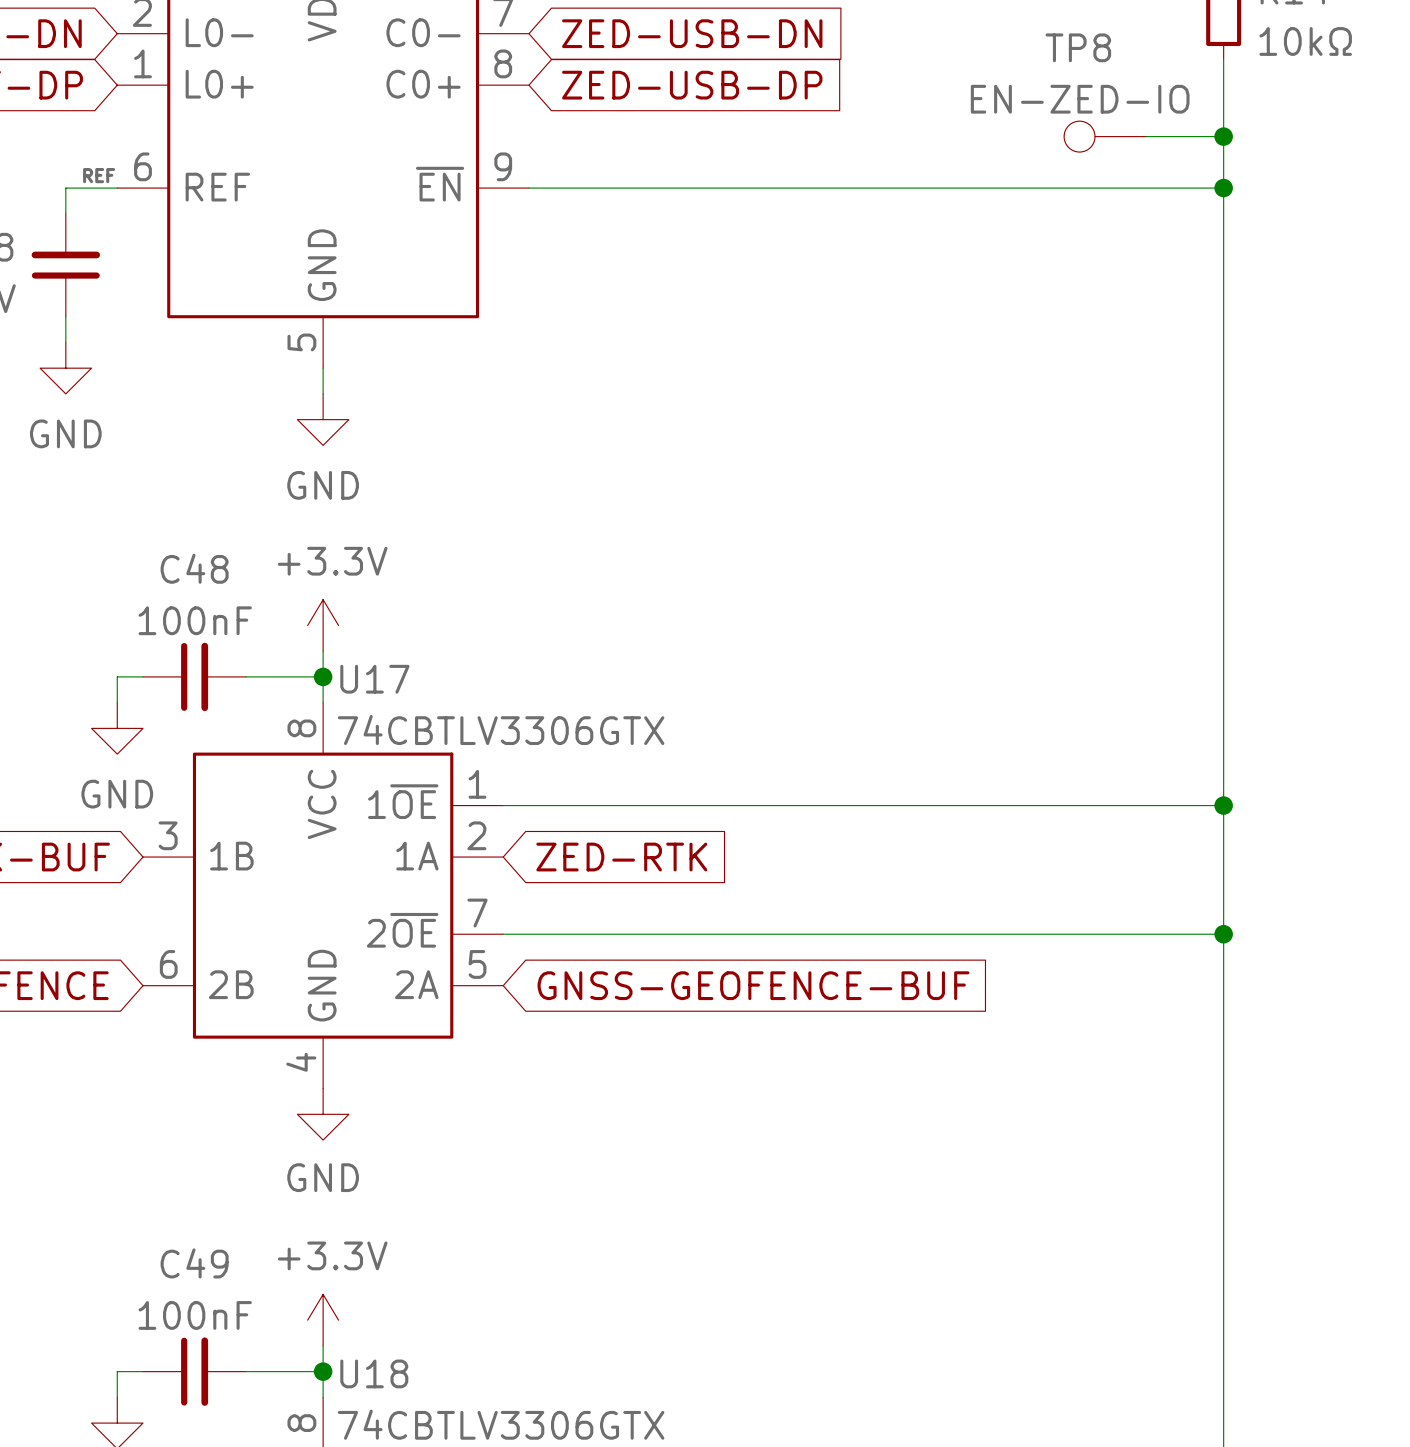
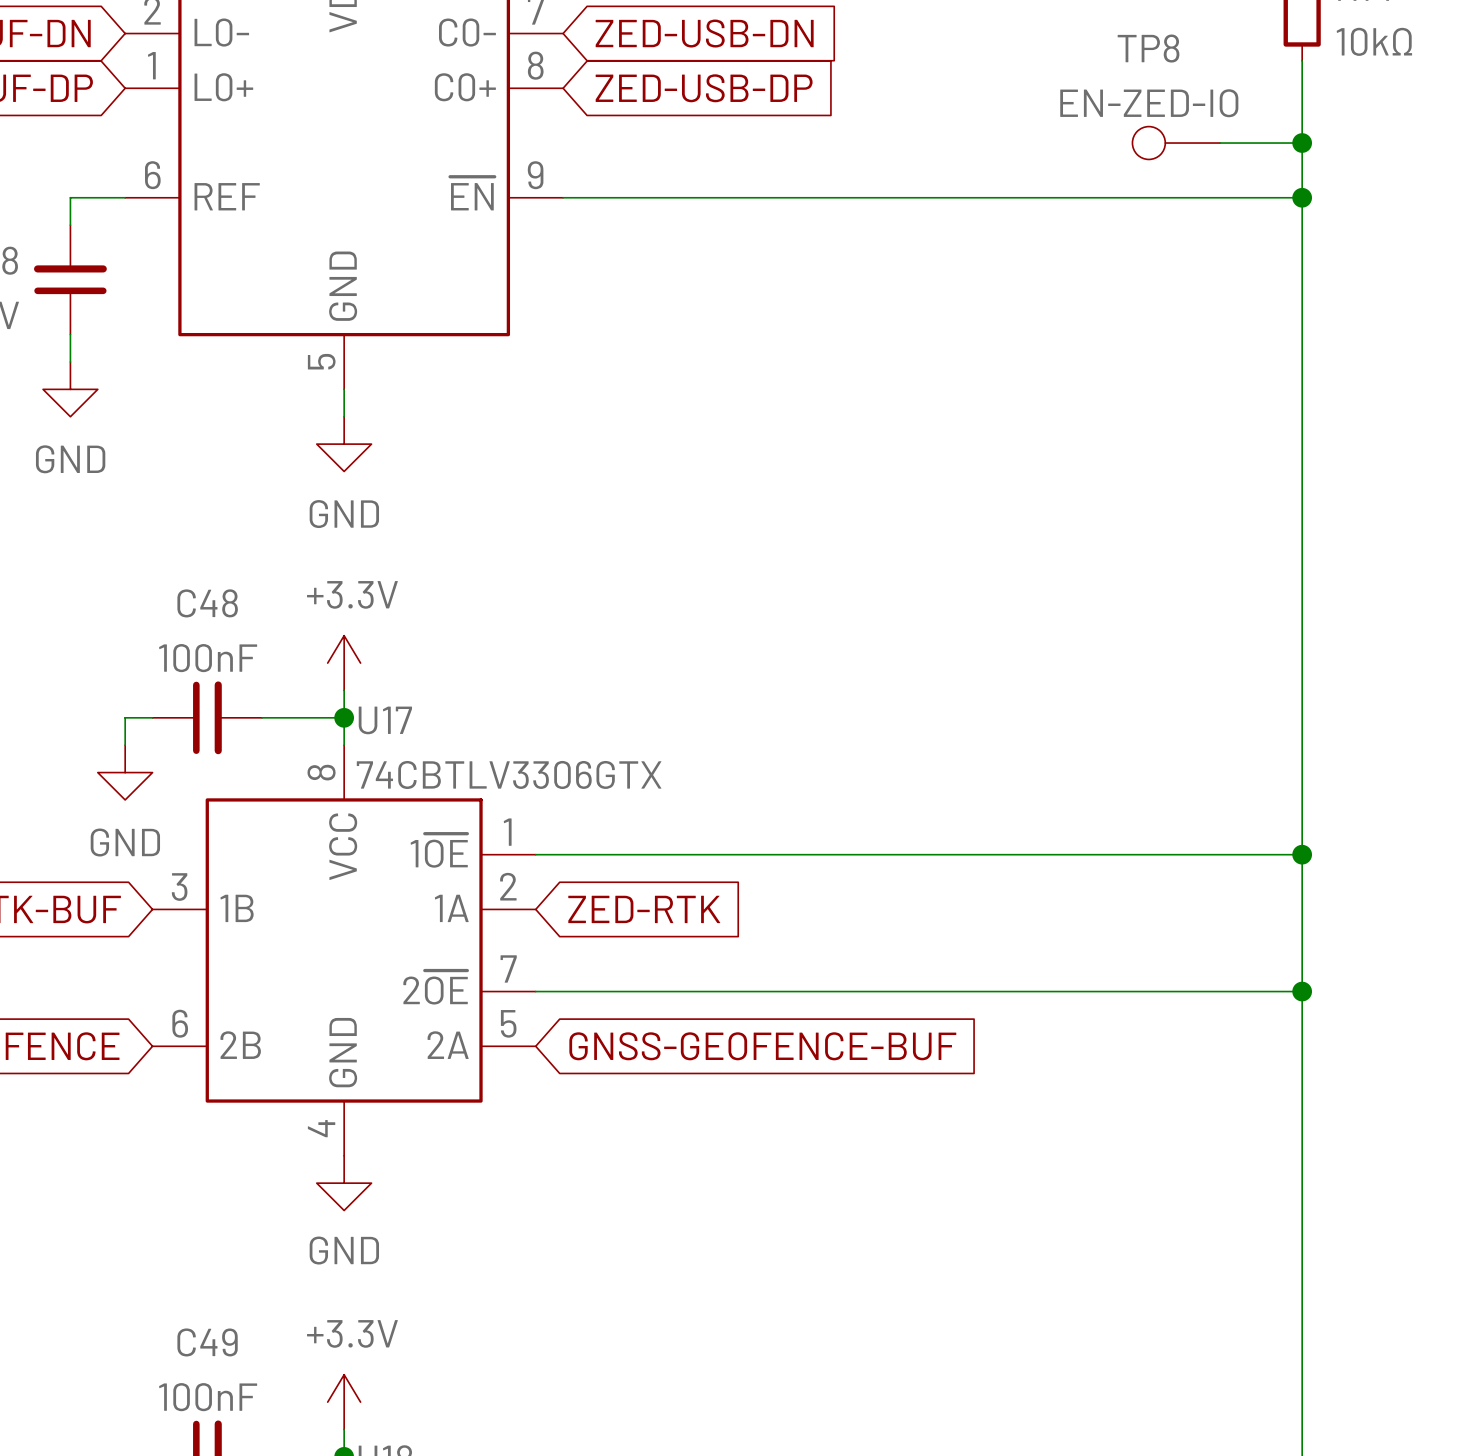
label: REF (99, 175) -> none

